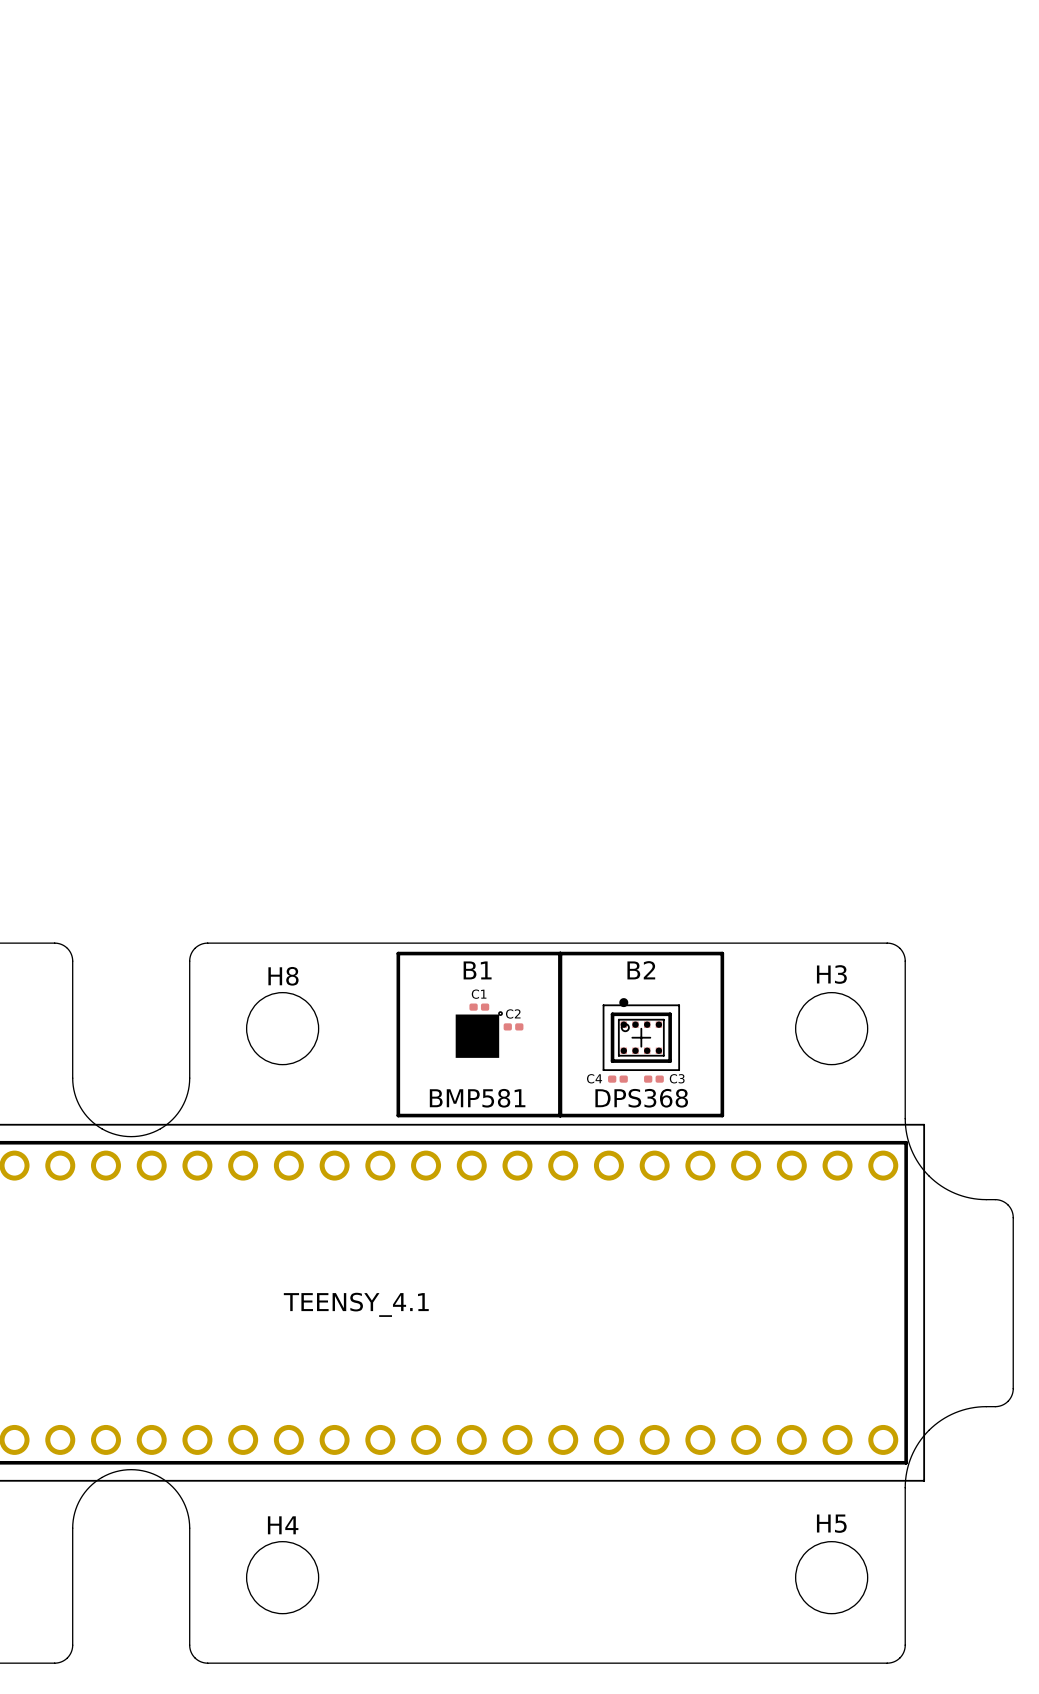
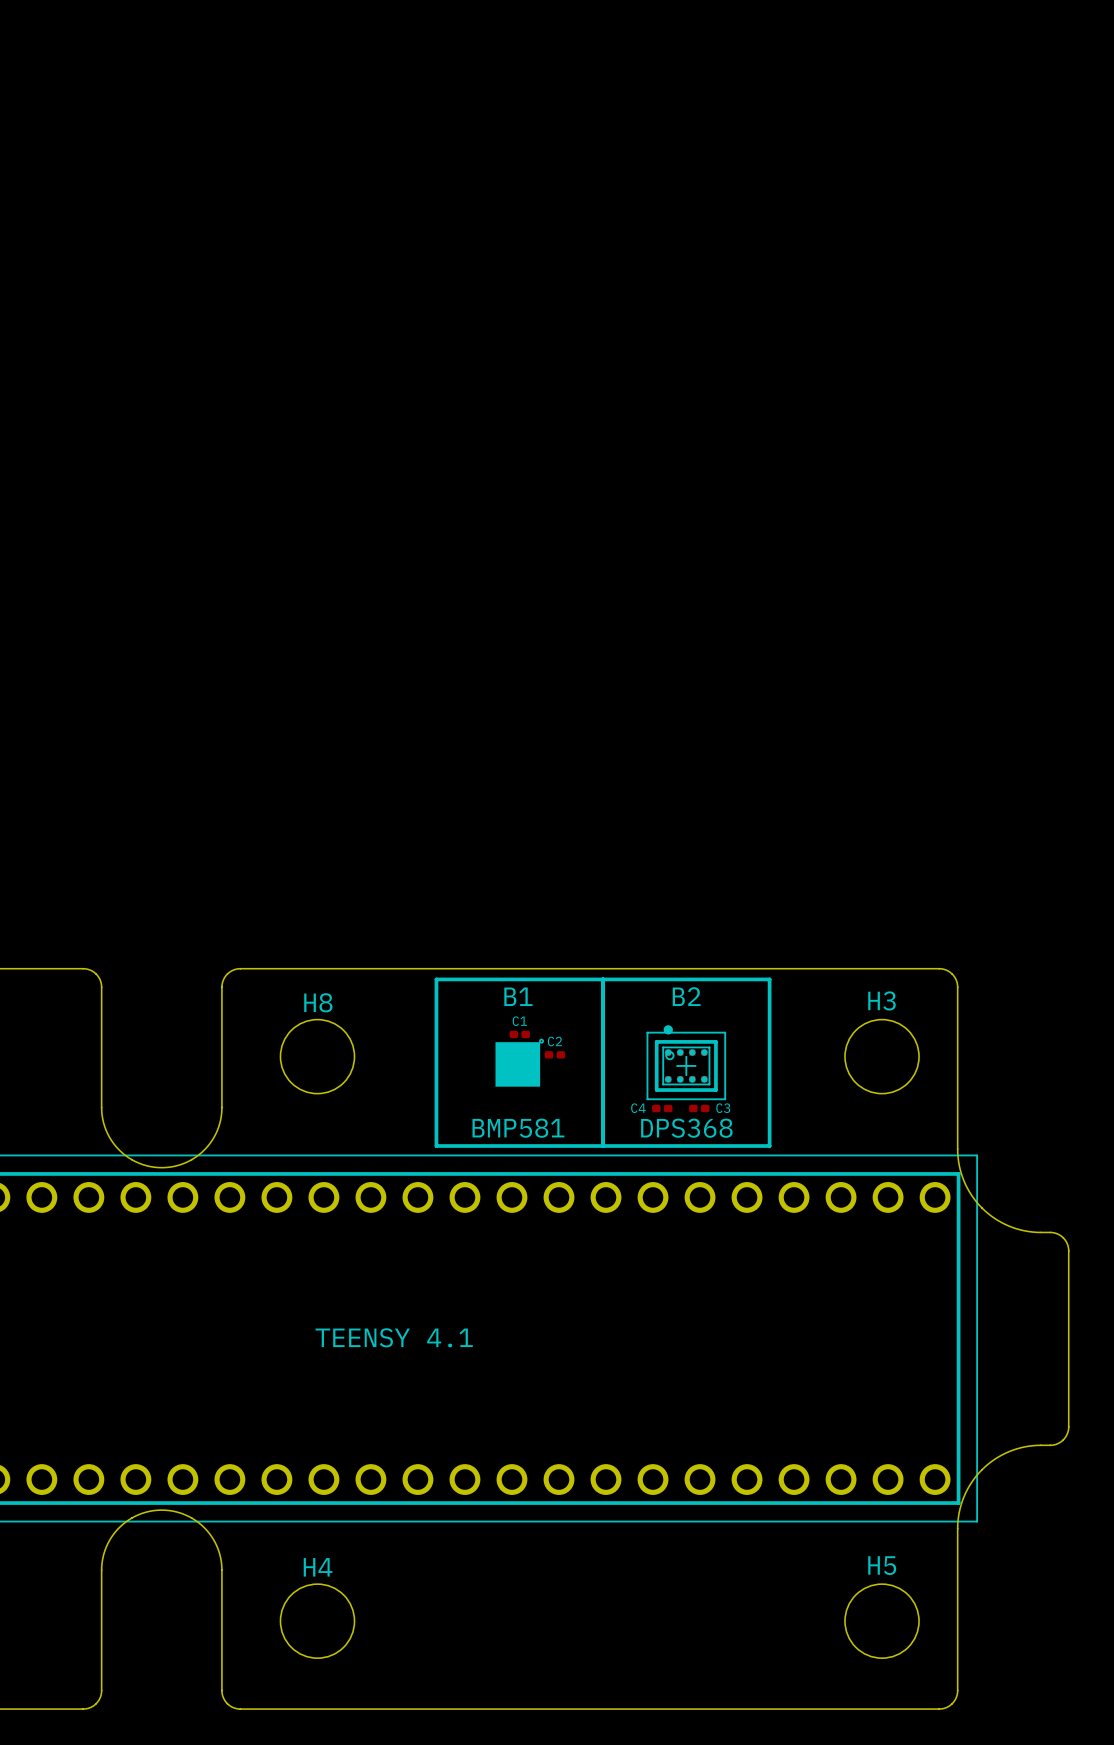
part value: TEENSY_4.1 (356, 1304) -> TEENSY 4.1 (394, 1337)

